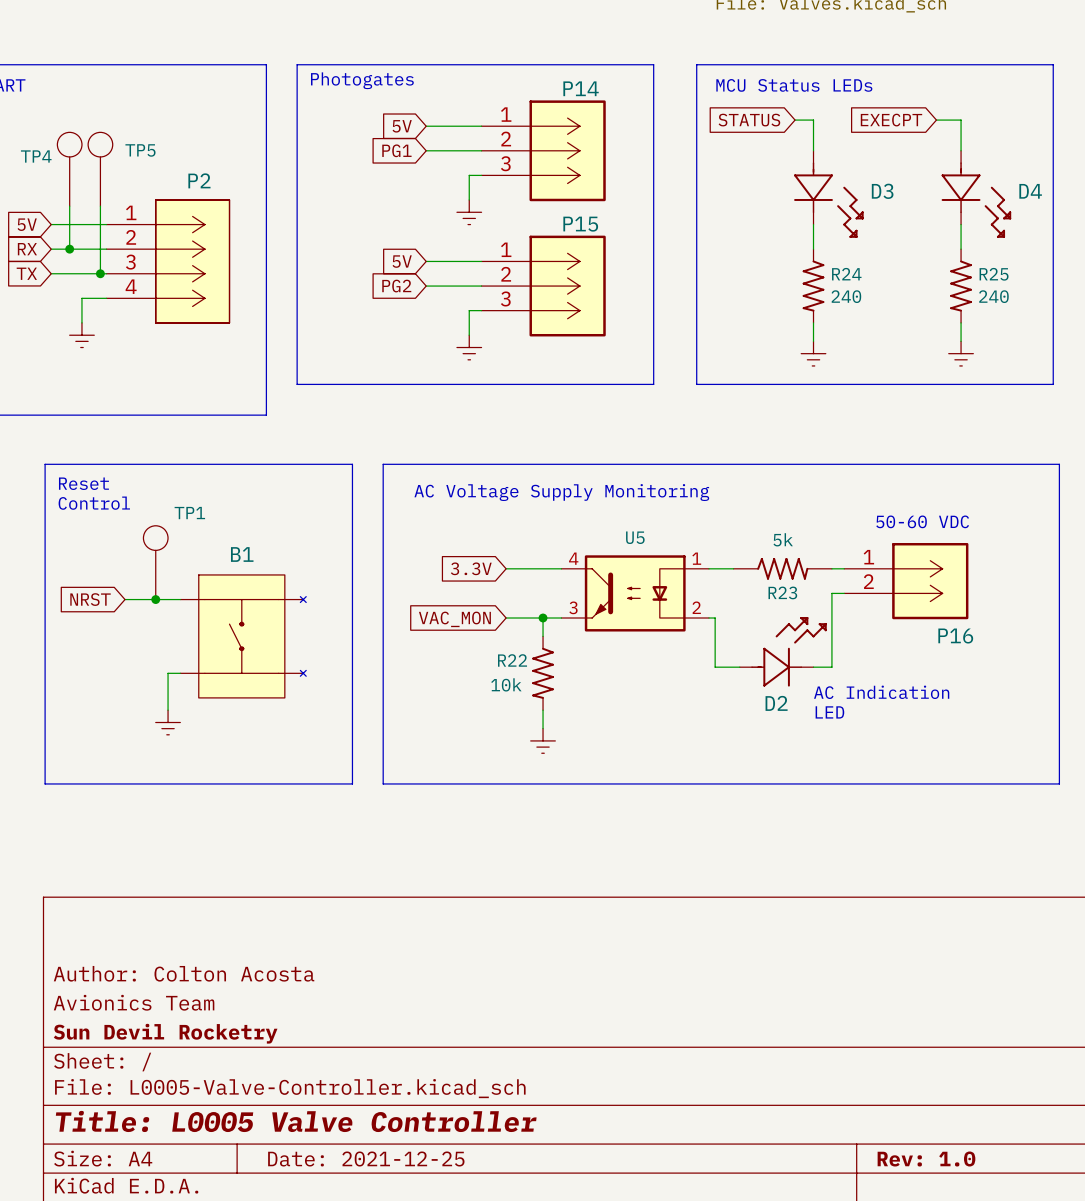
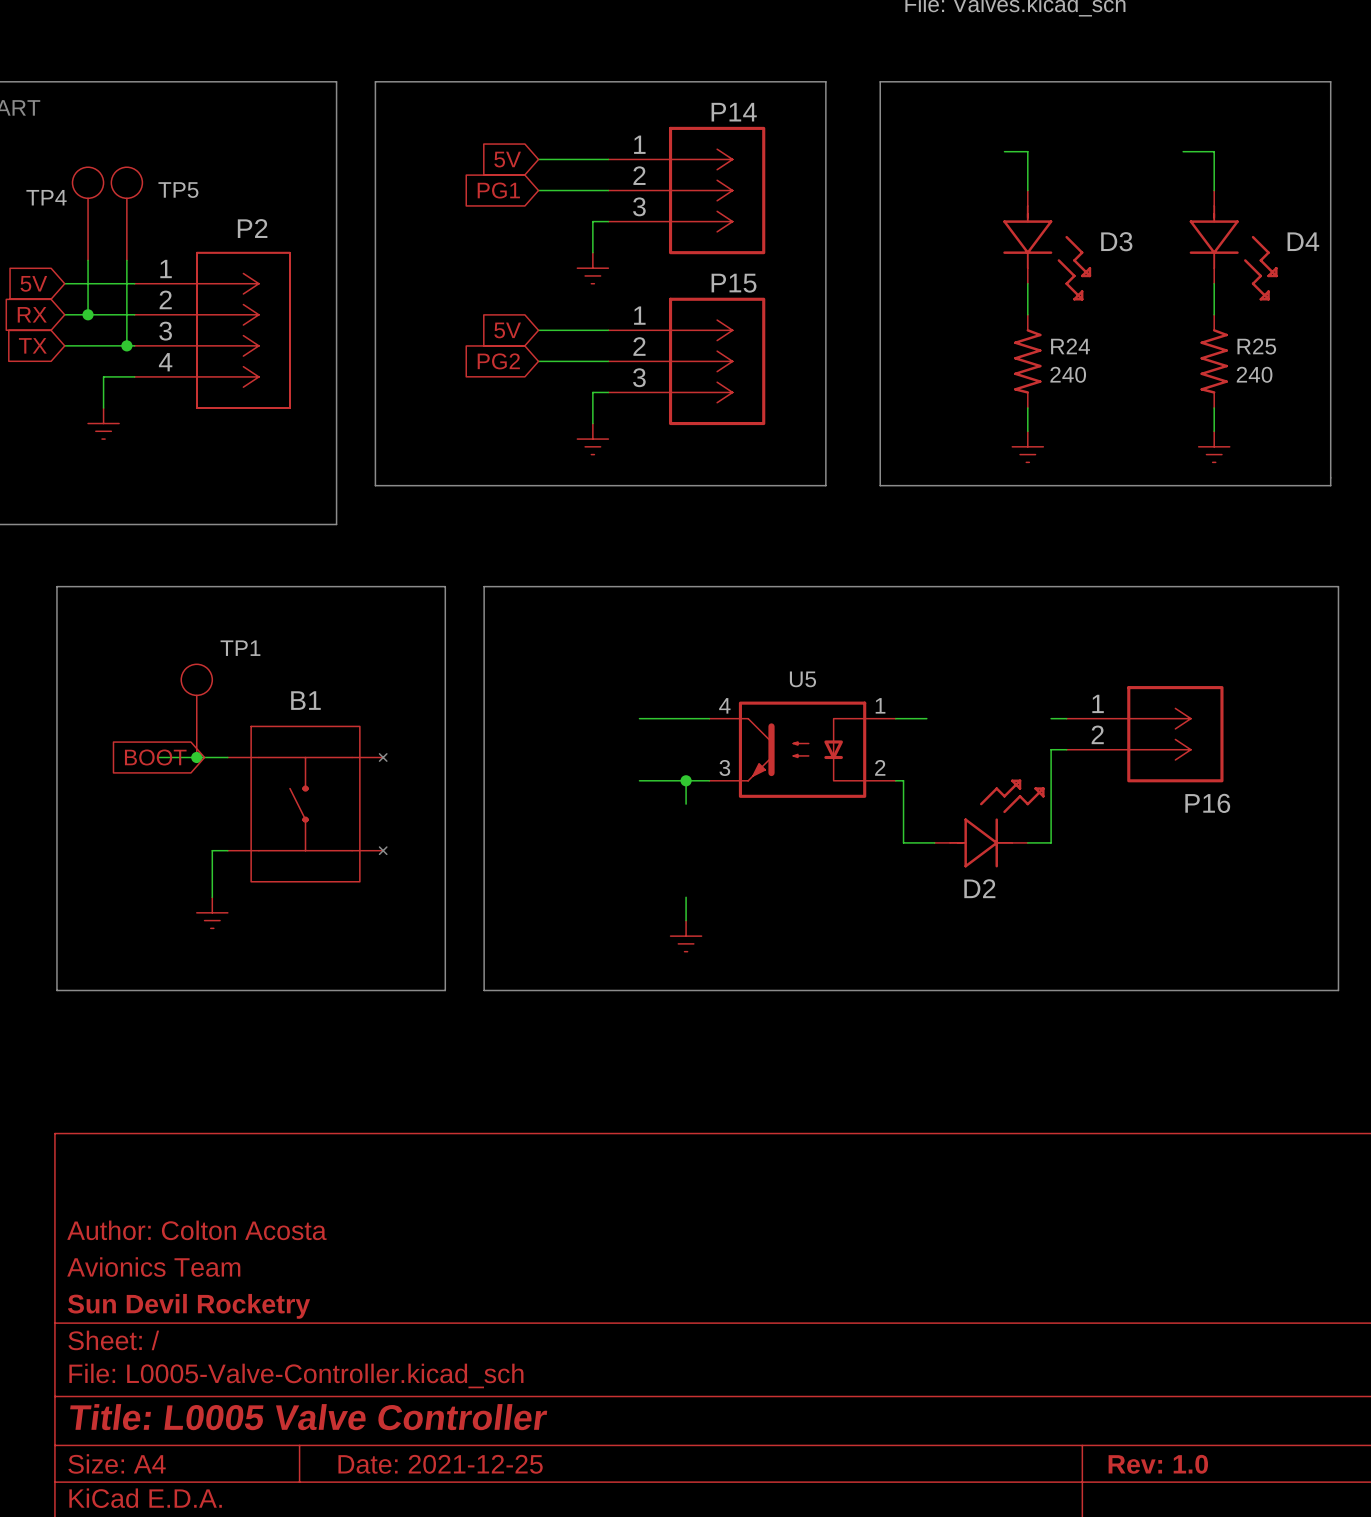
text: Photogates (362, 80) -> none
text: MCU Status LEDs (794, 85) -> none
global label: STATUS (749, 120) -> none
global label: EXECPT (891, 120) -> none
text: Reset (83, 483) -> none
text: AC Voltage Supply Monitoring (561, 492) -> none
text: Control (94, 503) -> none
text: 50-60 VDC (922, 521) -> none
global label: 3.3V (471, 568) -> none
R23: 5k (782, 568) -> none
global label: NRST (90, 599) -> none
global label: none -> BOOT (155, 757)
global label: VAC_MON (454, 619) -> none
R22: 10k (543, 673) -> none
text: AC Indication (881, 692) -> none
text: LED (829, 712) -> none

